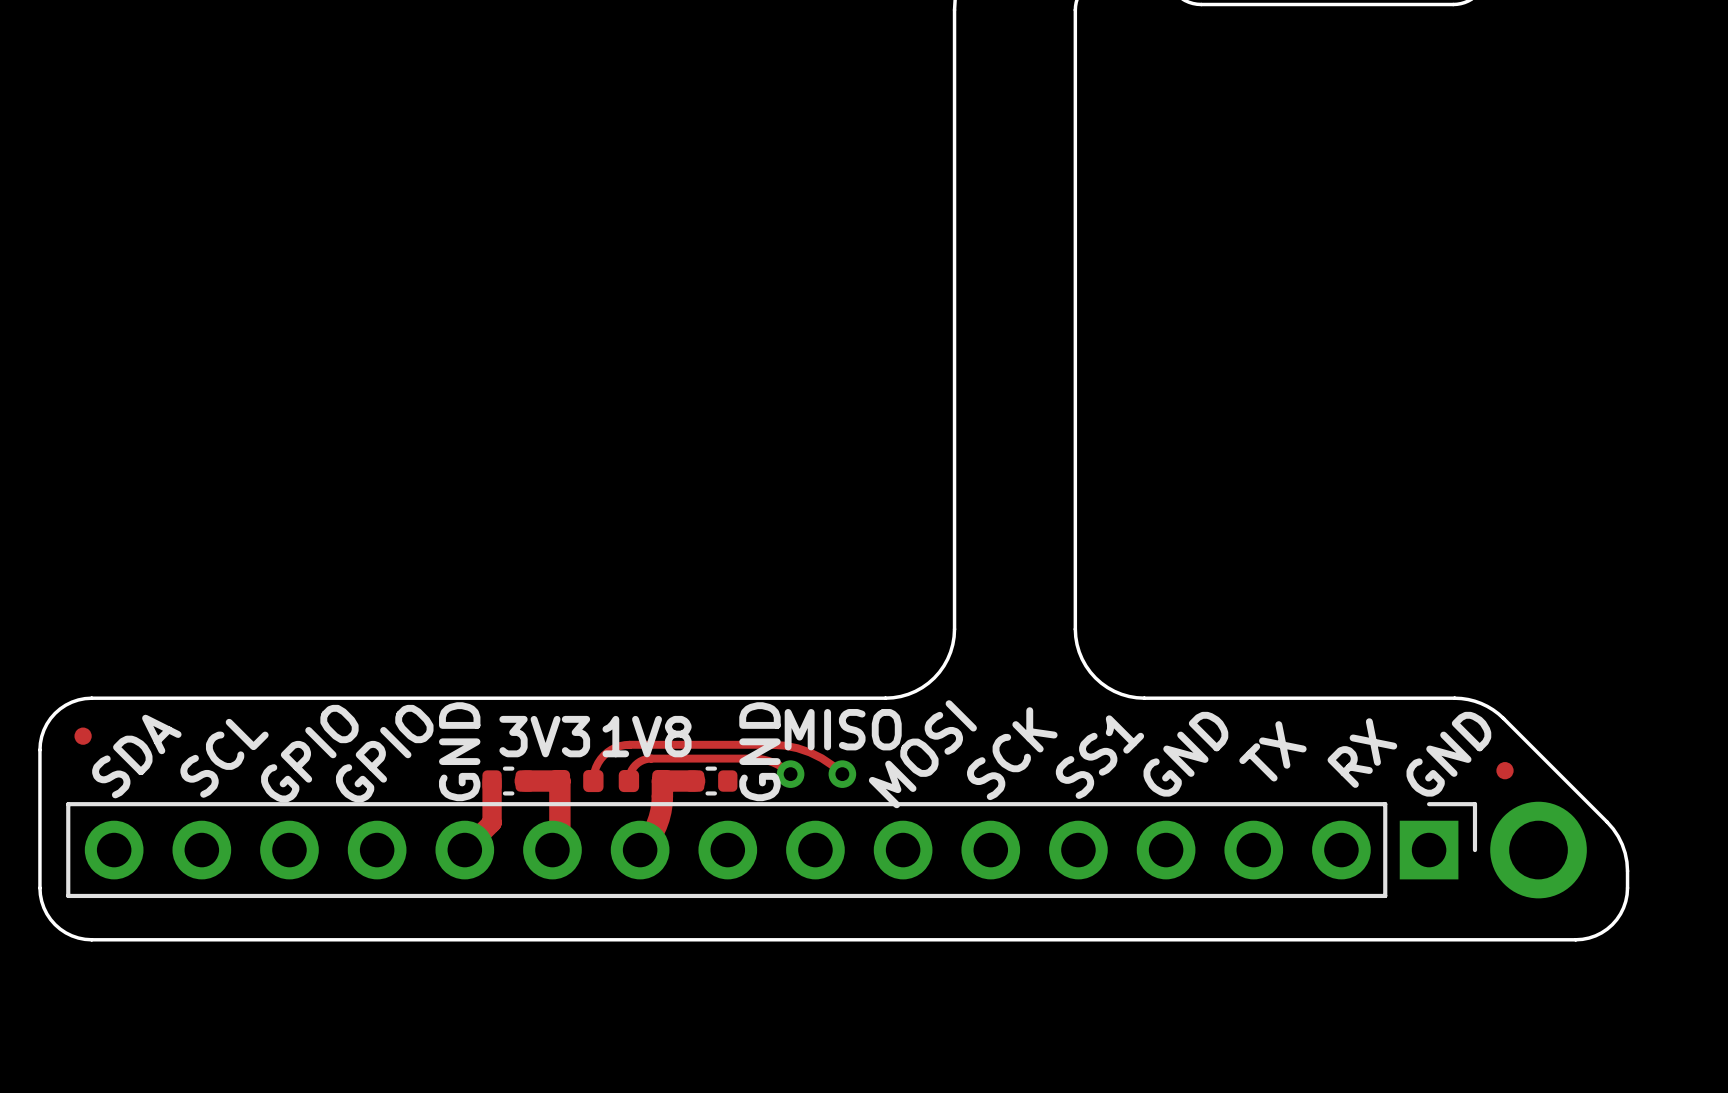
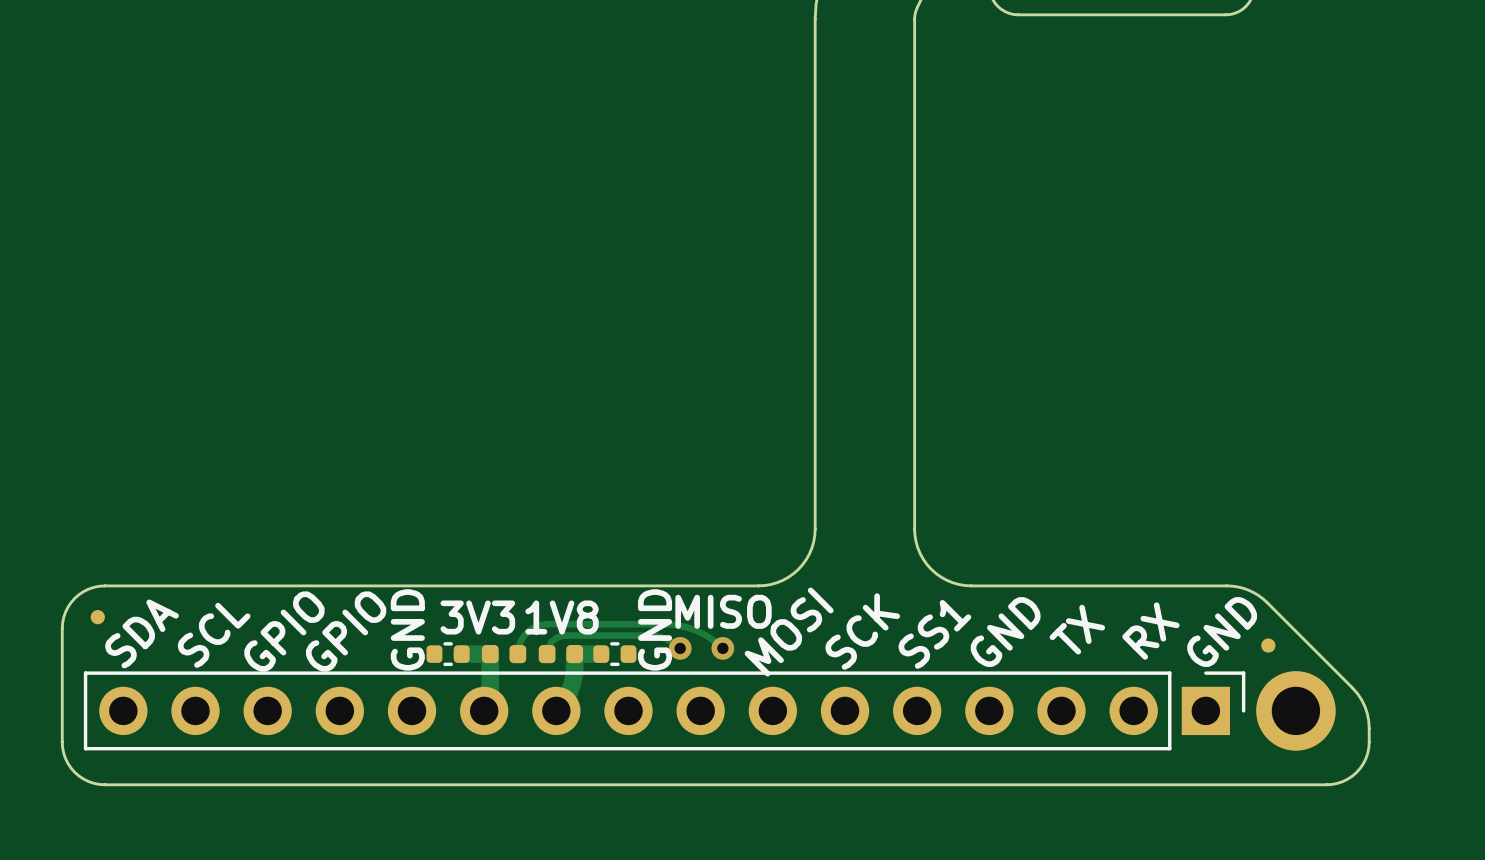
track: (492, 781) (492, 822) (464, 850) -> none

